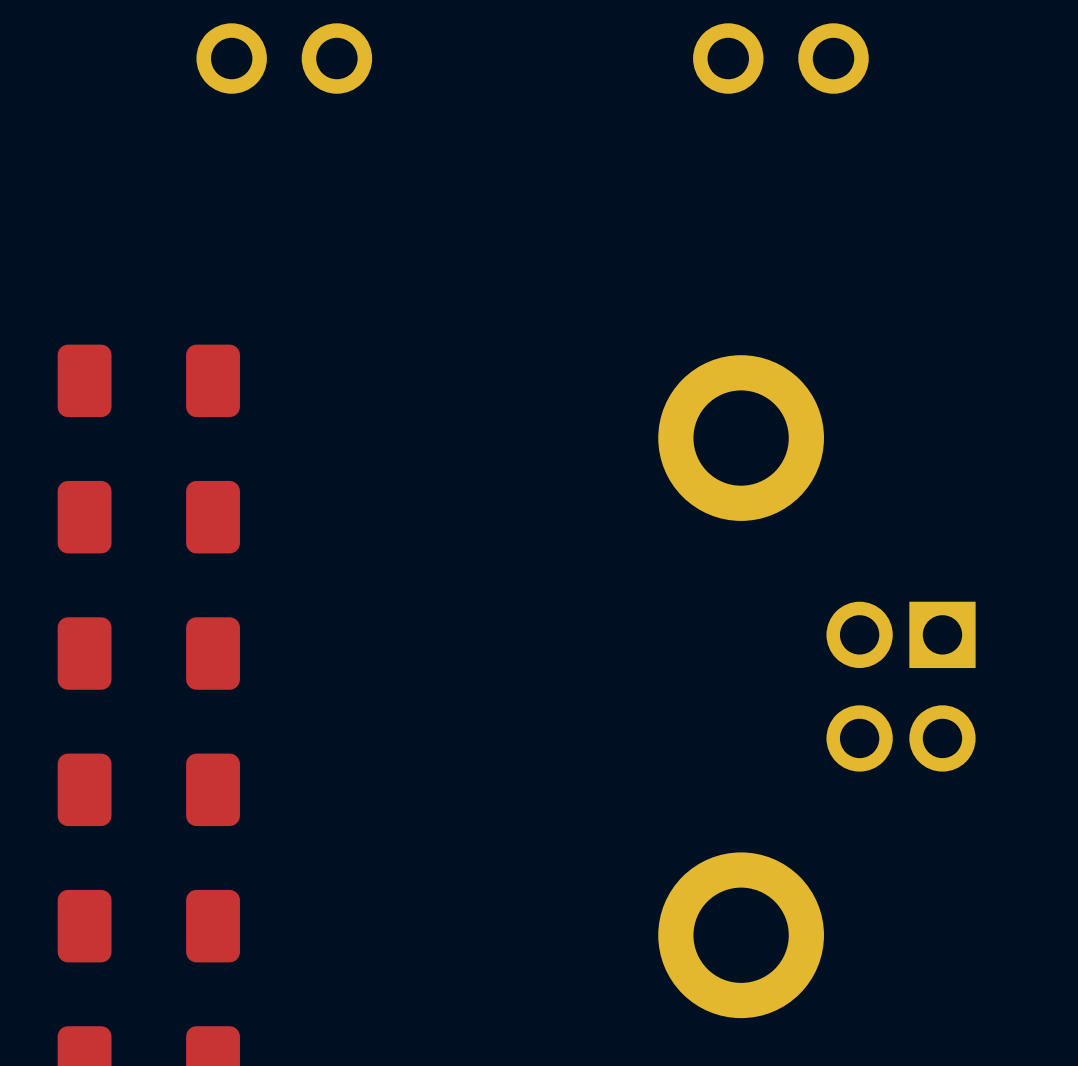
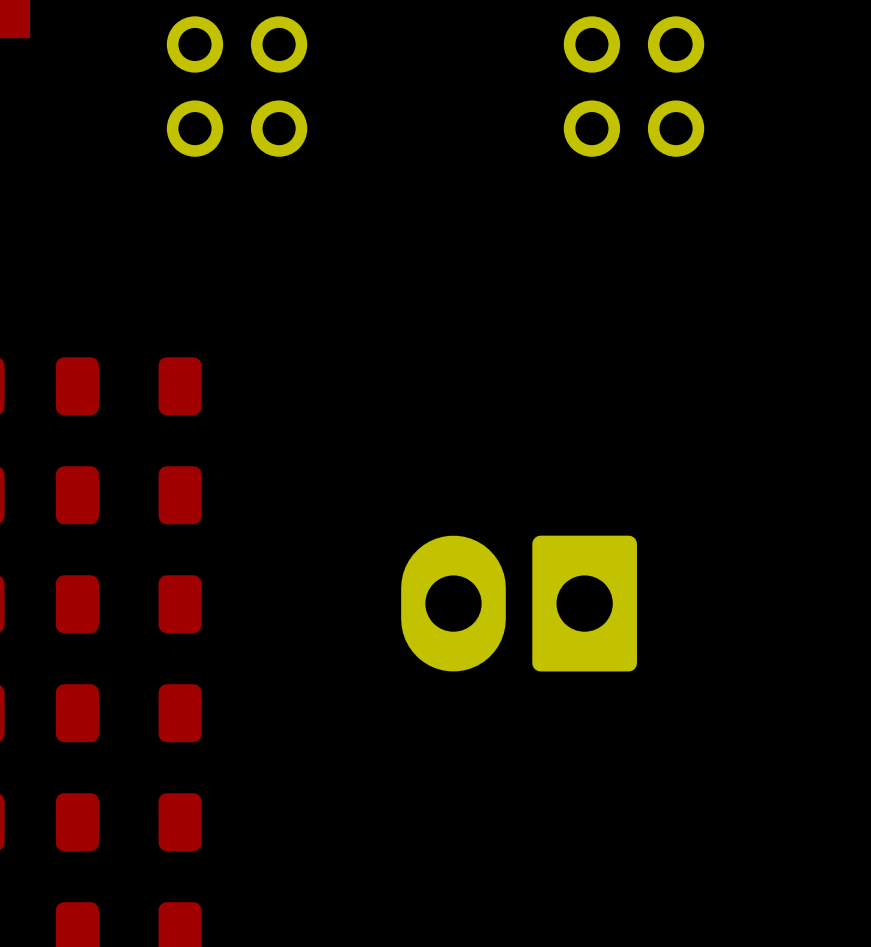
part: none -> (519, 603)
part: (816, 686) -> none

